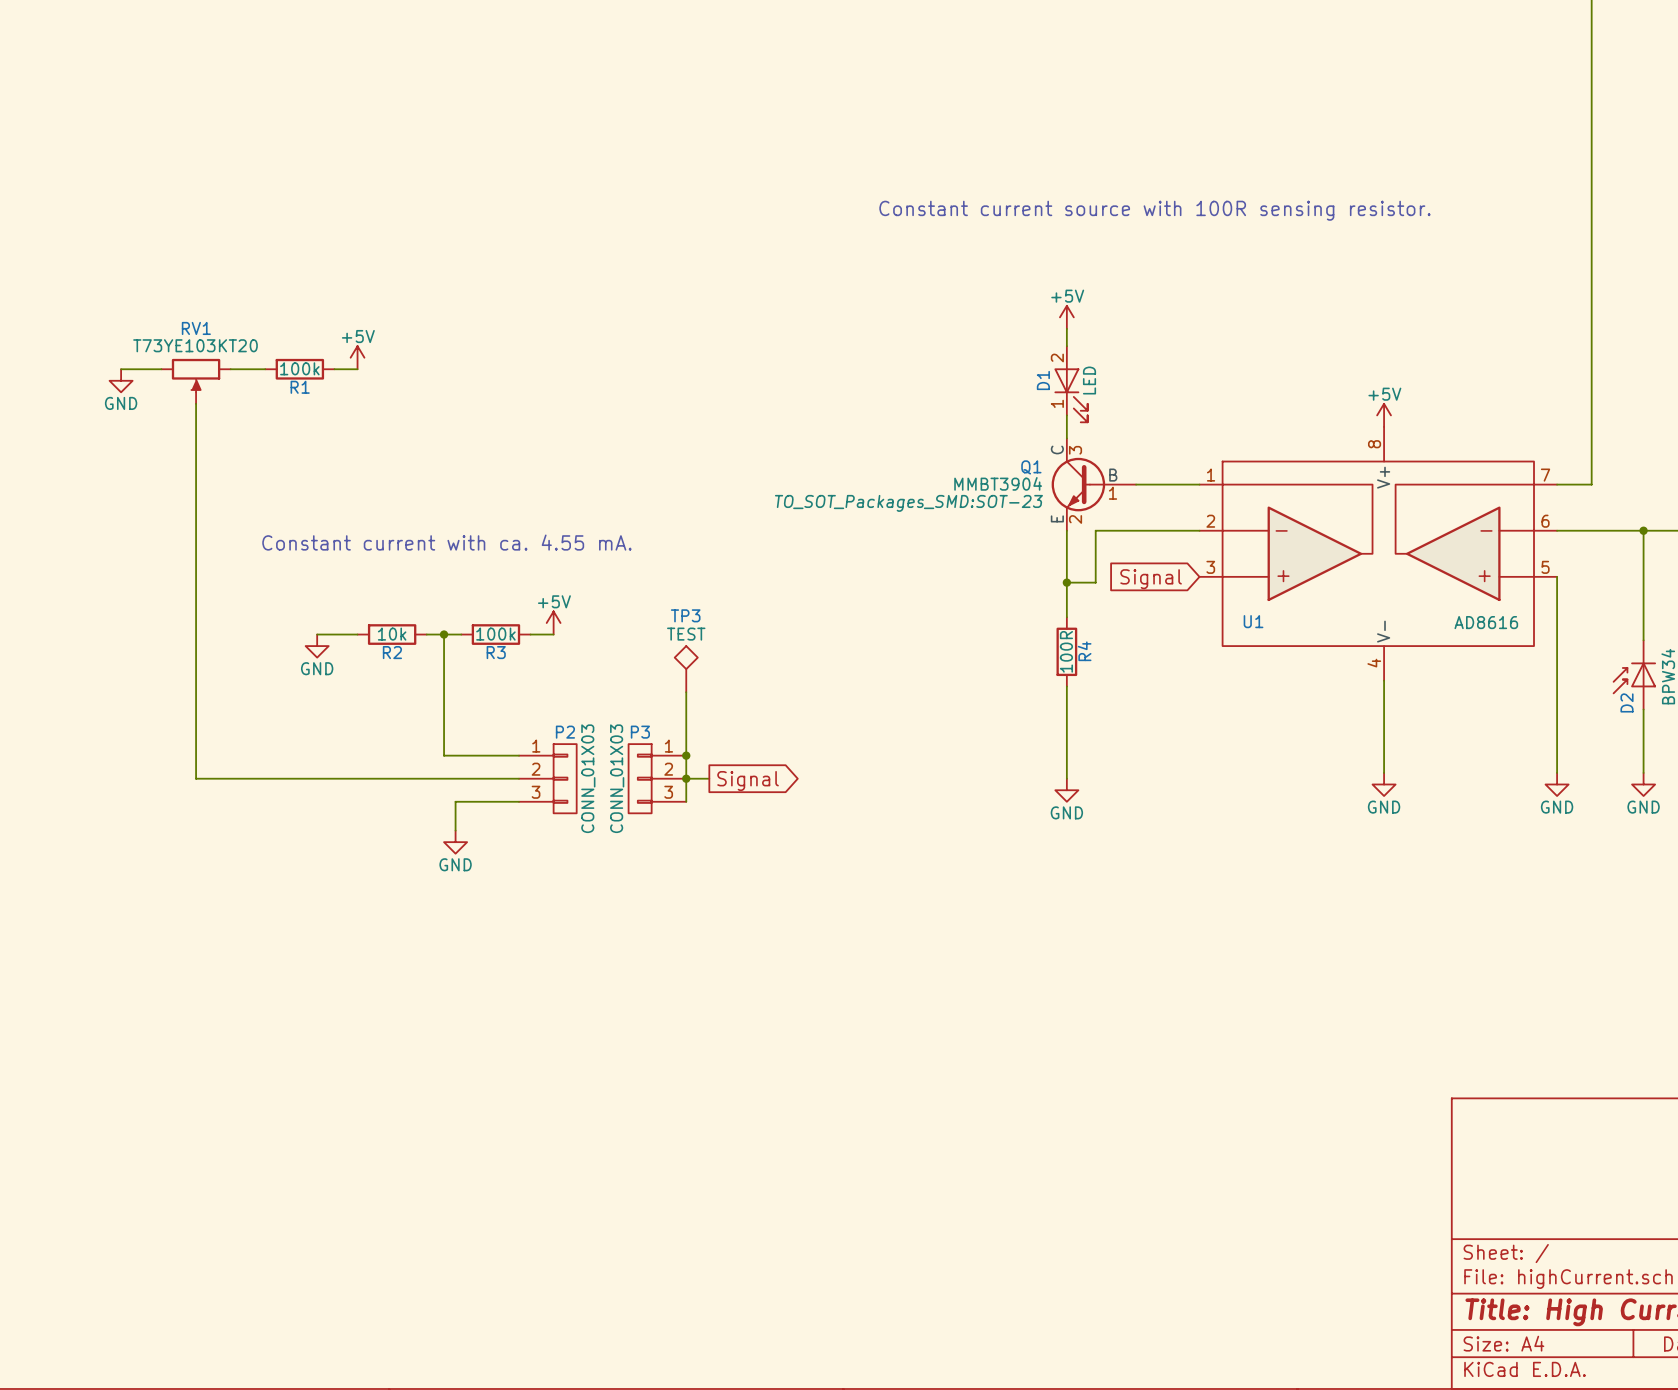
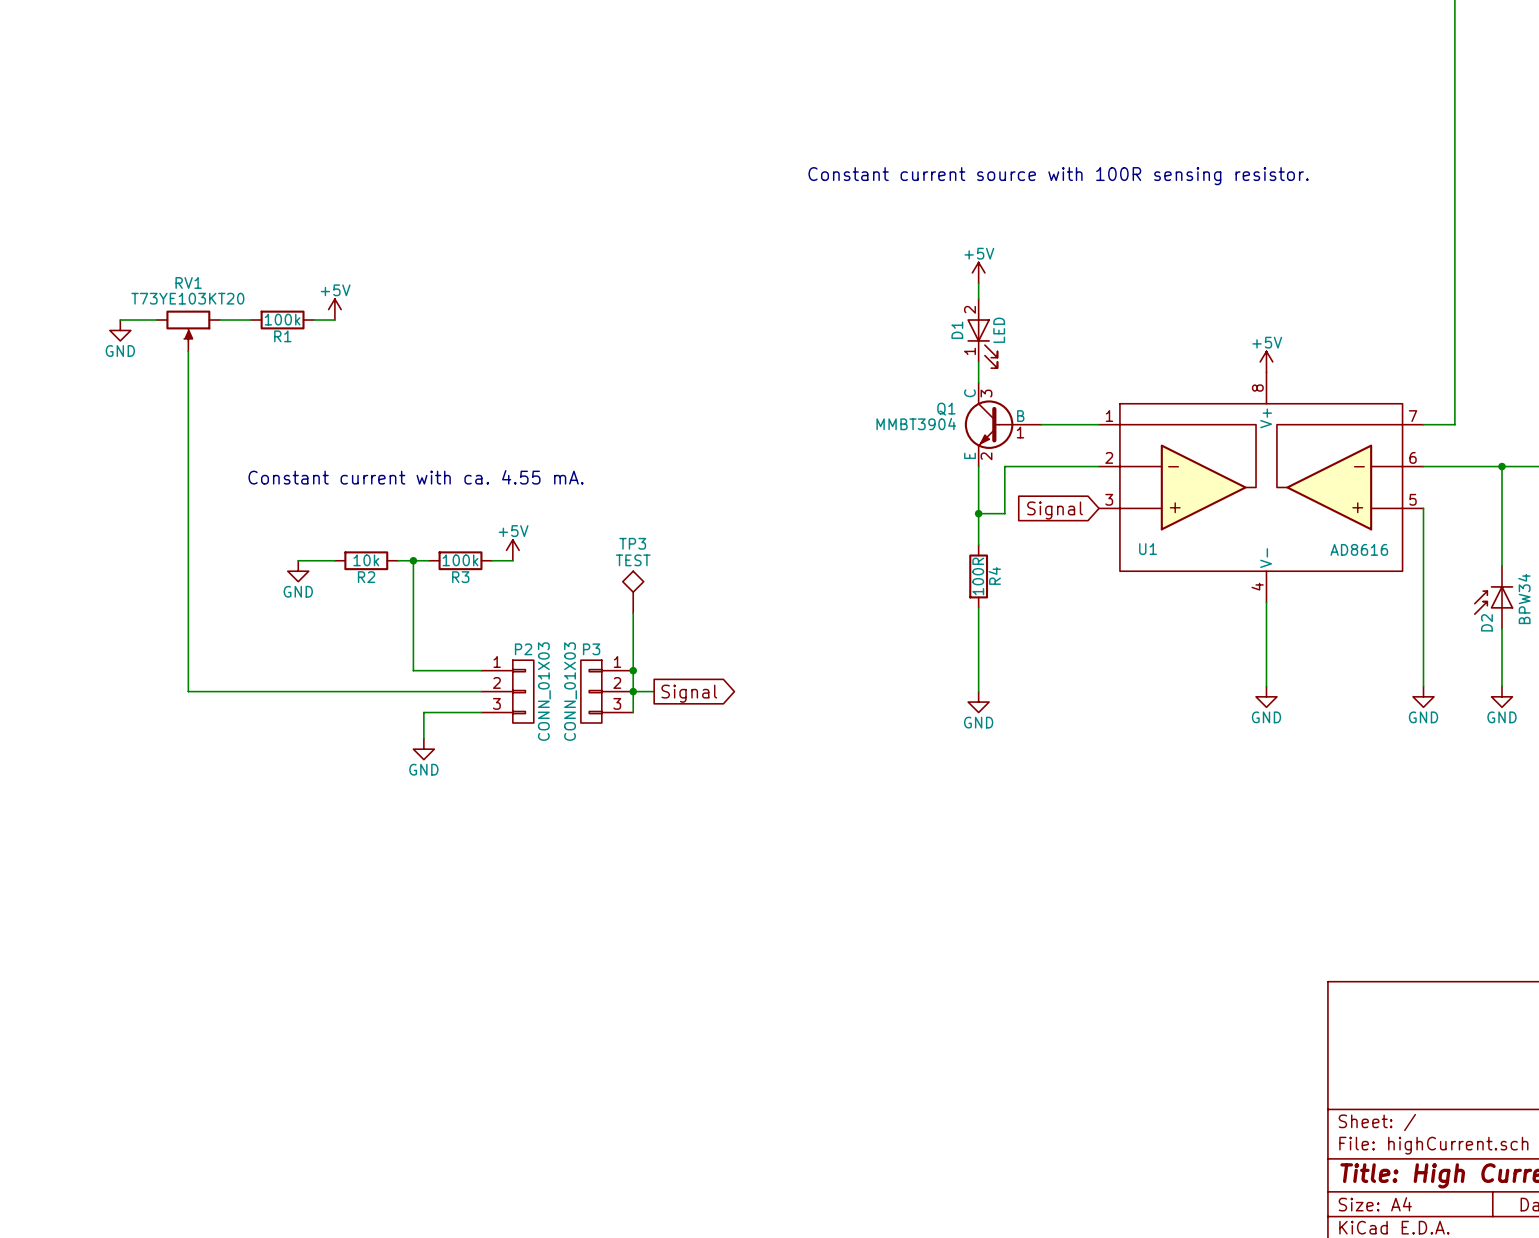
Q1 text: TO_SOT_Packages_SMD:SOT-23 (908, 503) -> none

